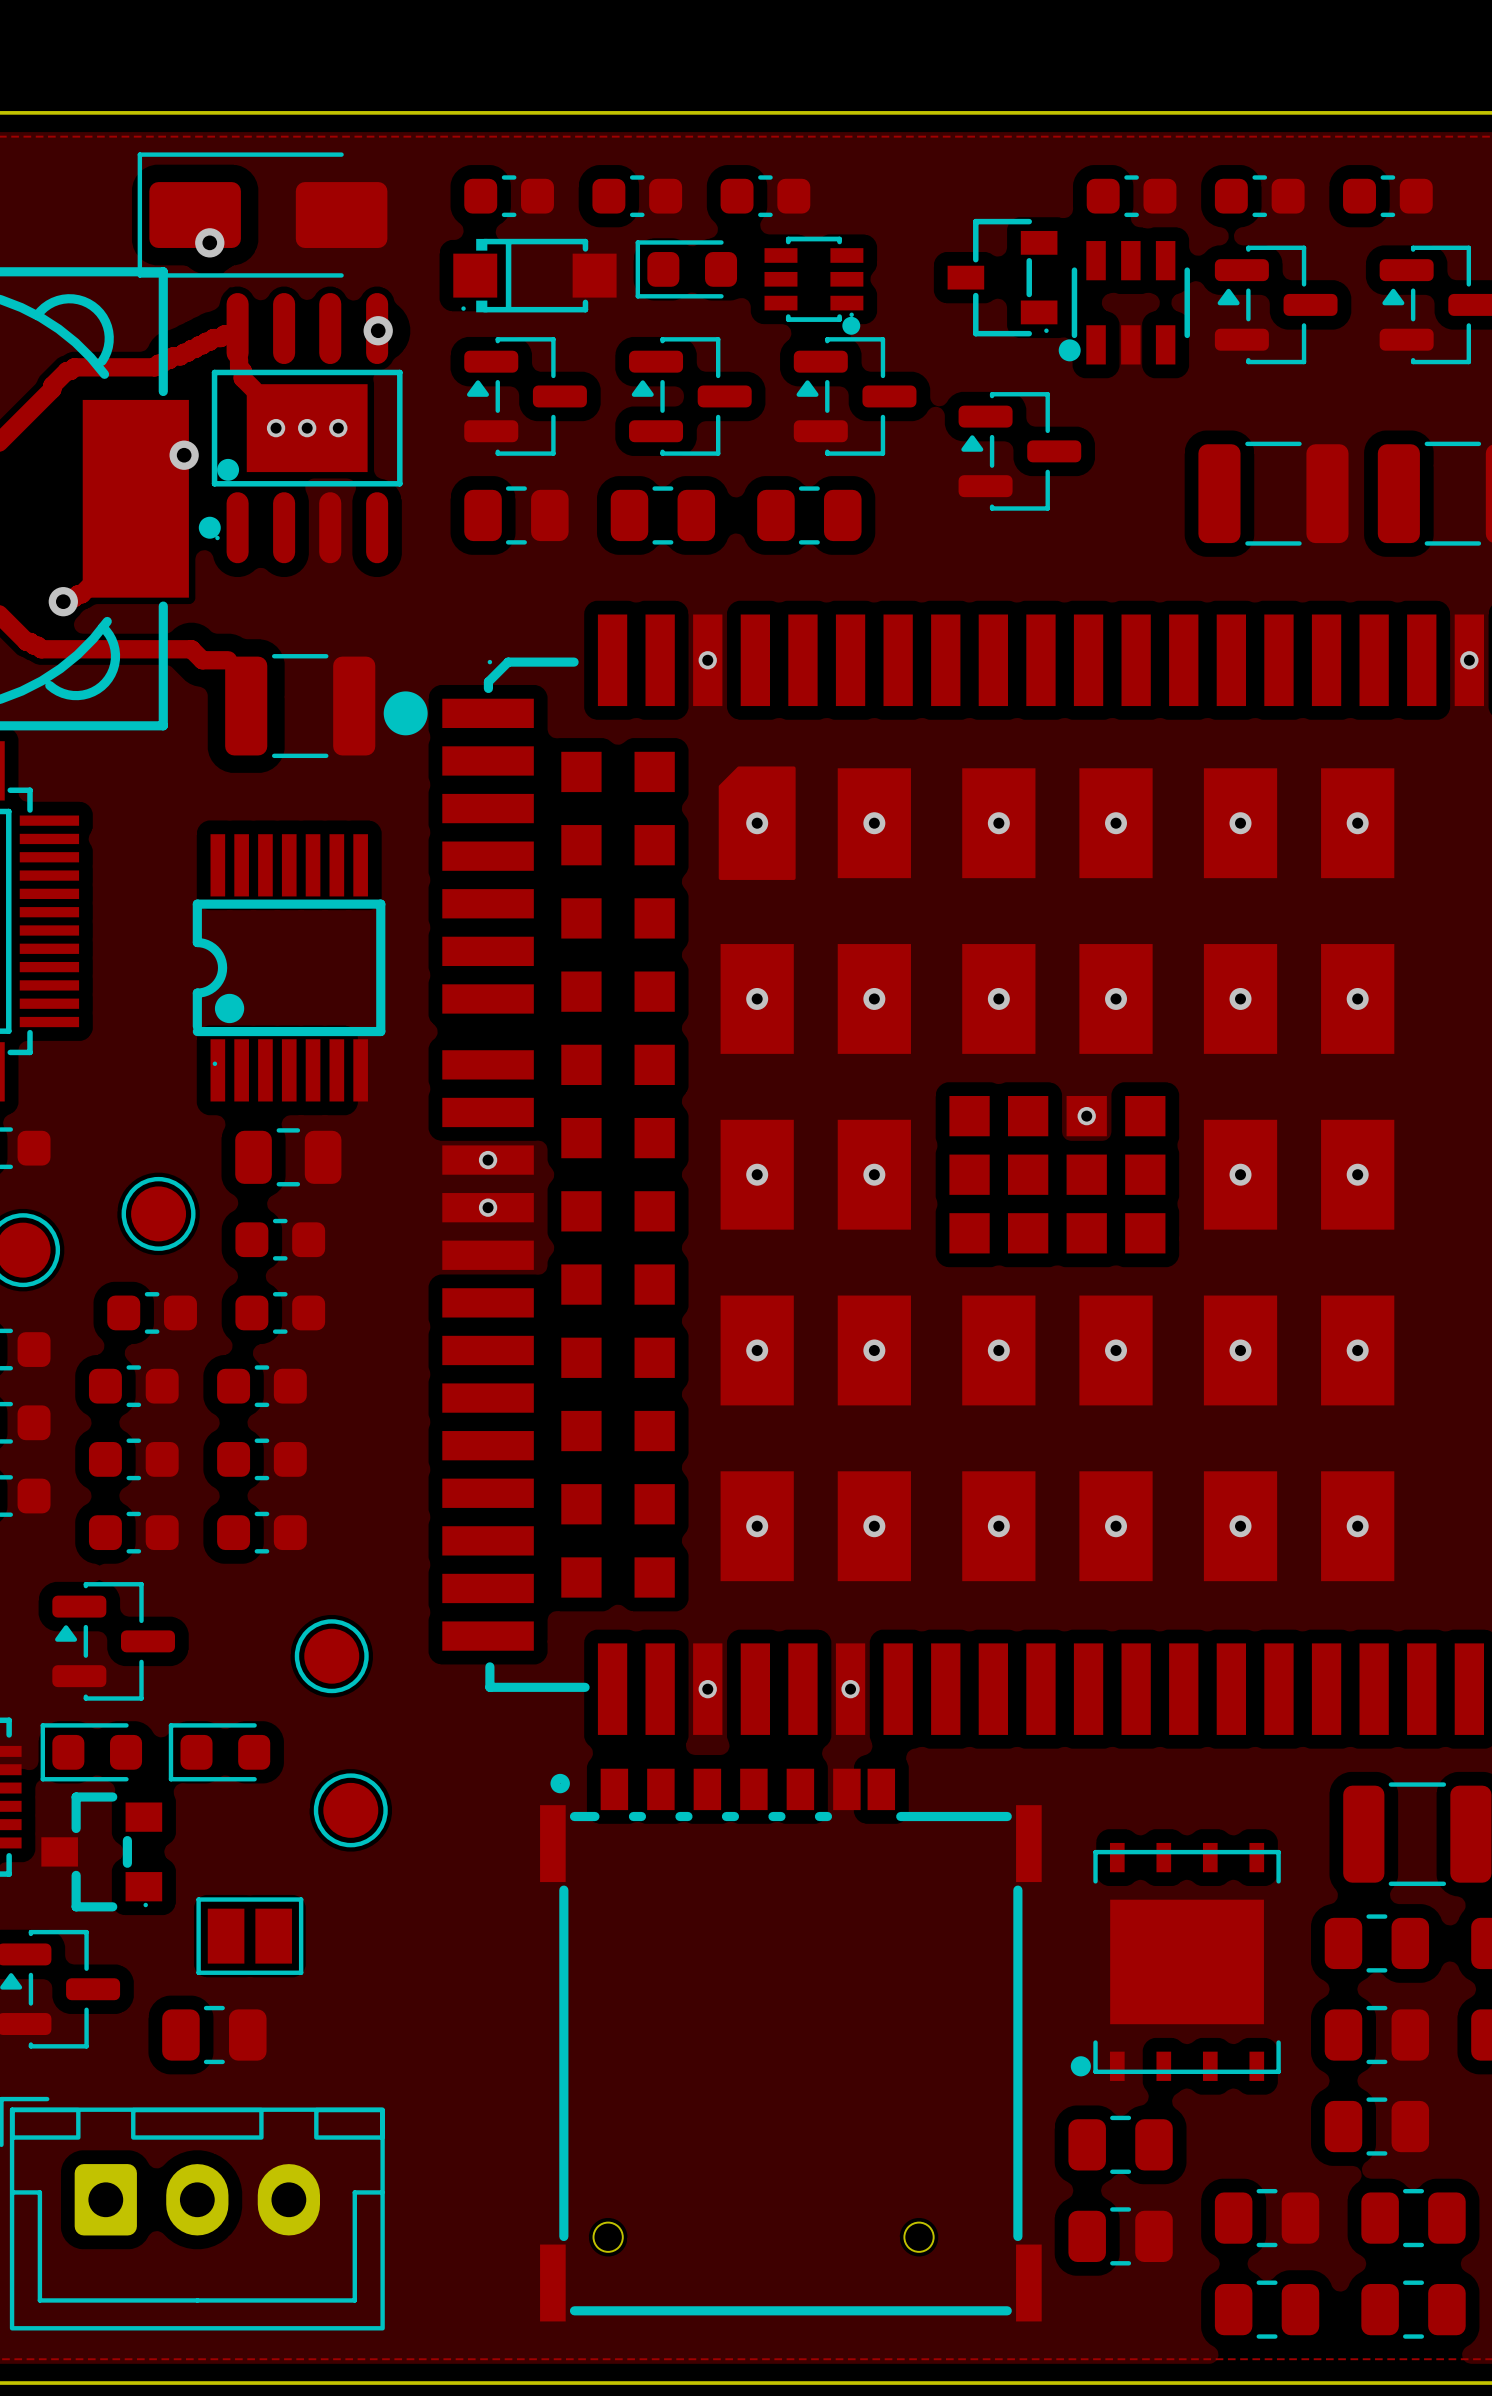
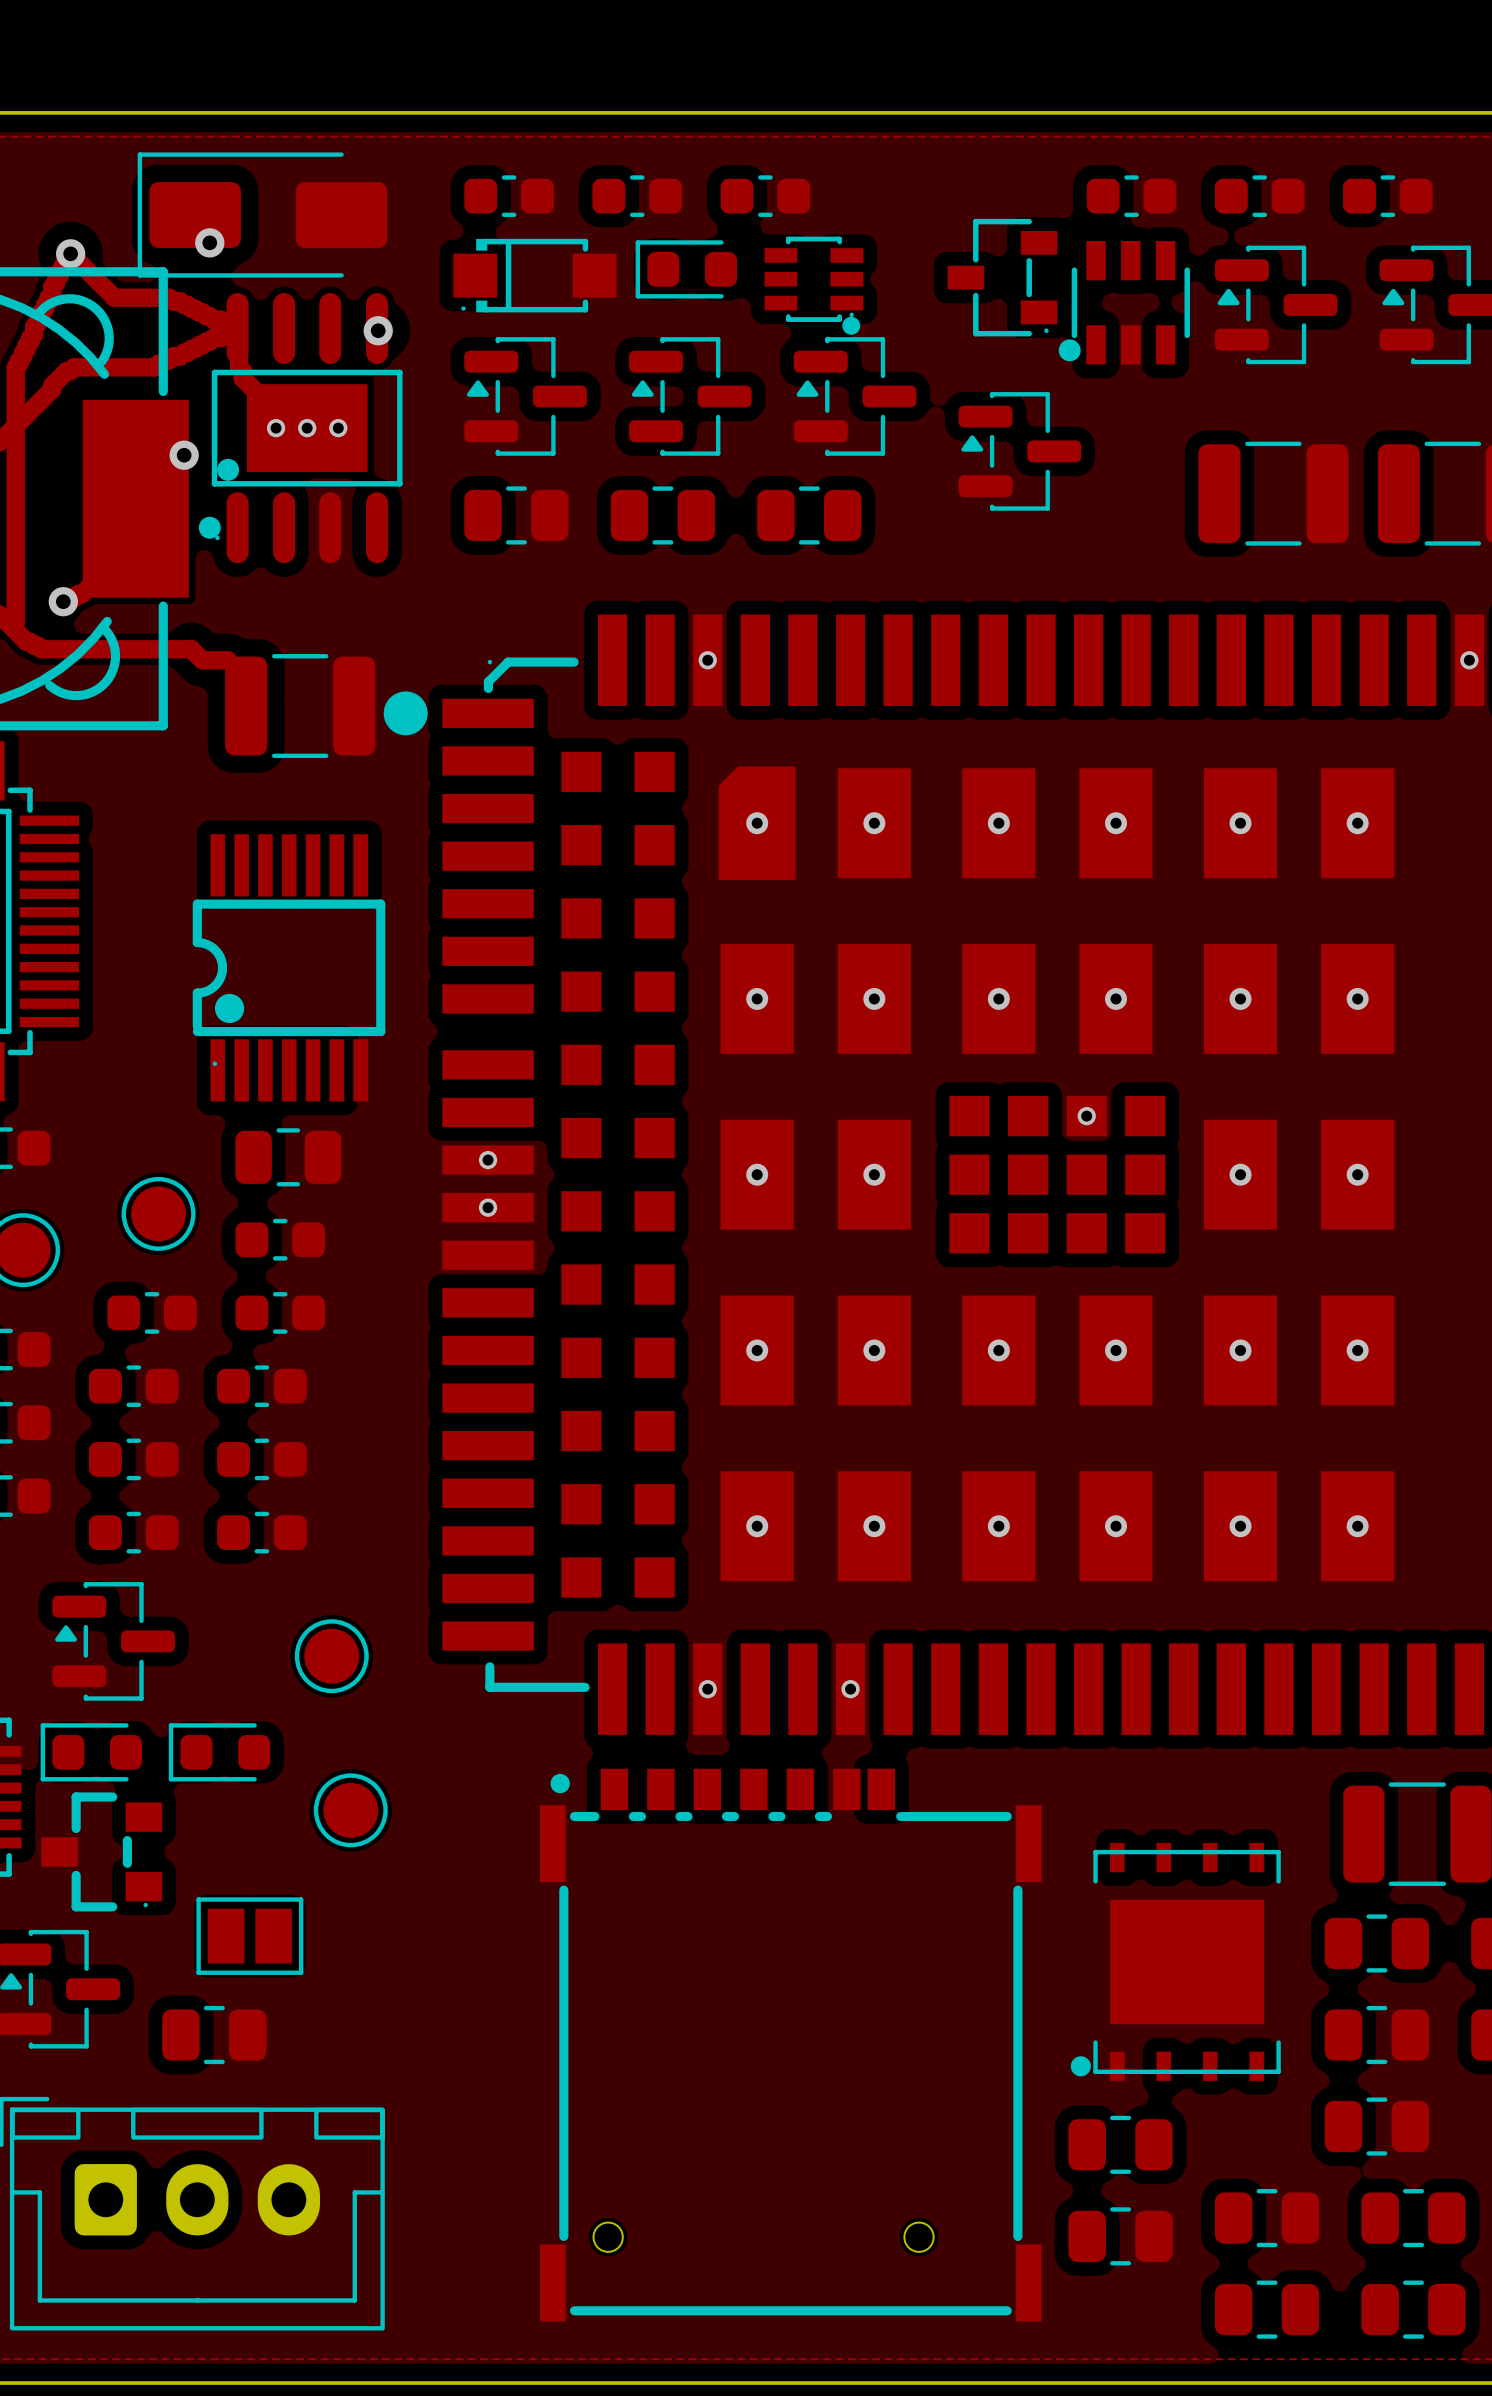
via: none -> (70, 253)
track: none -> (228, 323) (224, 323) (220, 319) (213, 319) (195, 308) (191, 308) (180, 301) (173, 301) (169, 297) (114, 297) (70, 253) (66, 257) (56, 283) (52, 286) (52, 294) (34, 327) (34, 334) (15, 367) (15, 623)

